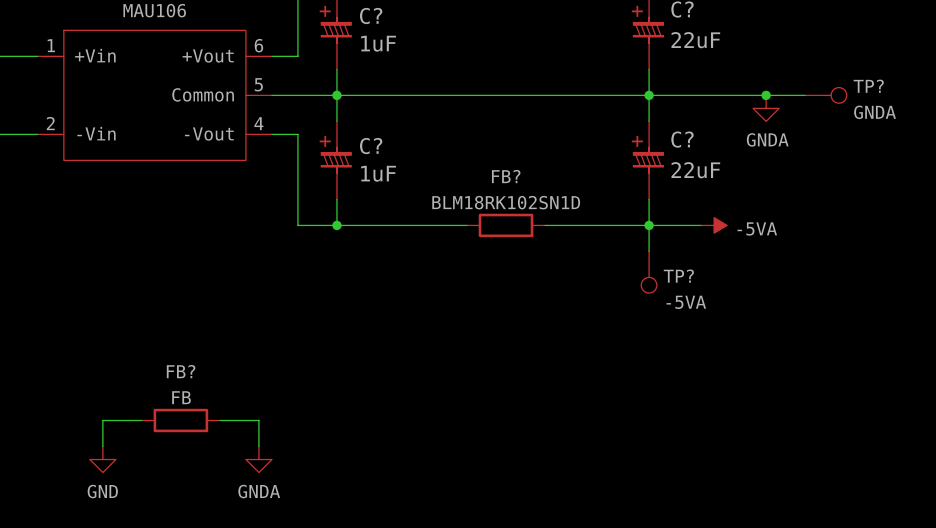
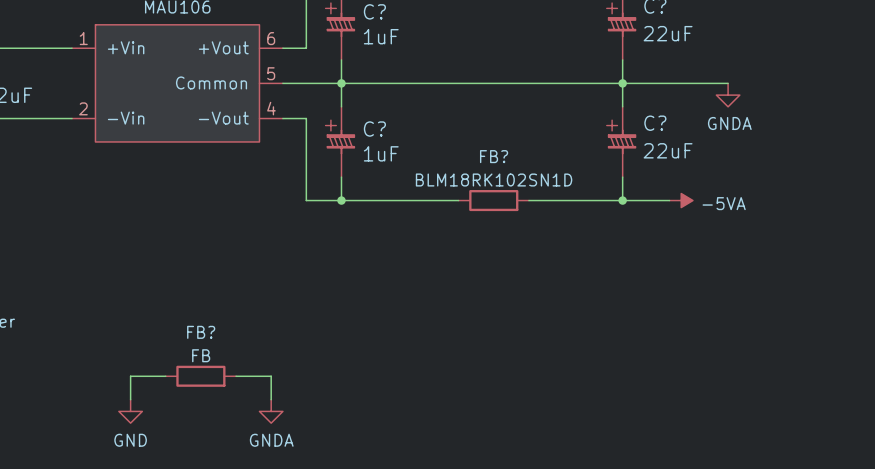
wire: (766, 95) (805, 95) -> none
junction: (766, 95) -> none
TP?: GNDA (825, 95) -> none
wire: (649, 225) (649, 251) -> none
TP?: -5VA (649, 272) -> none

